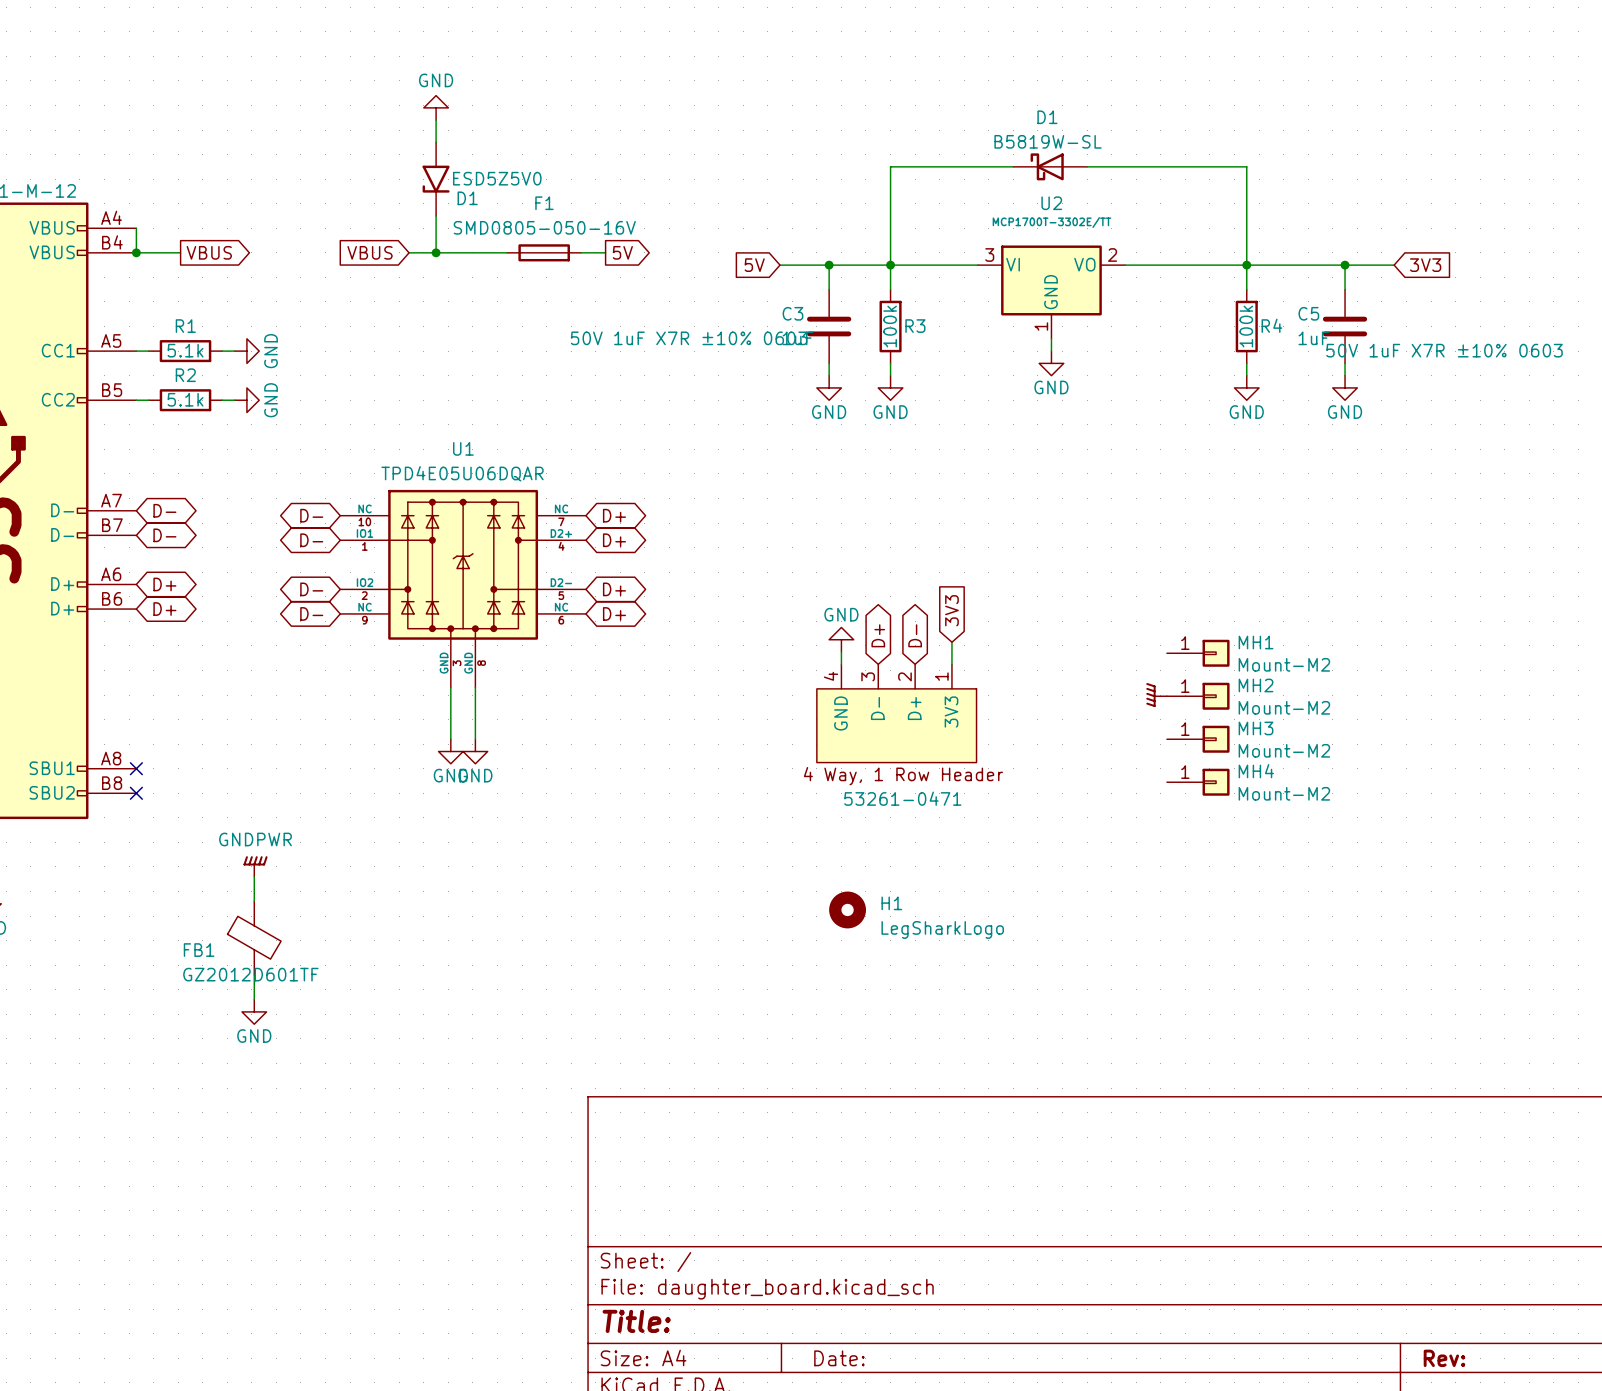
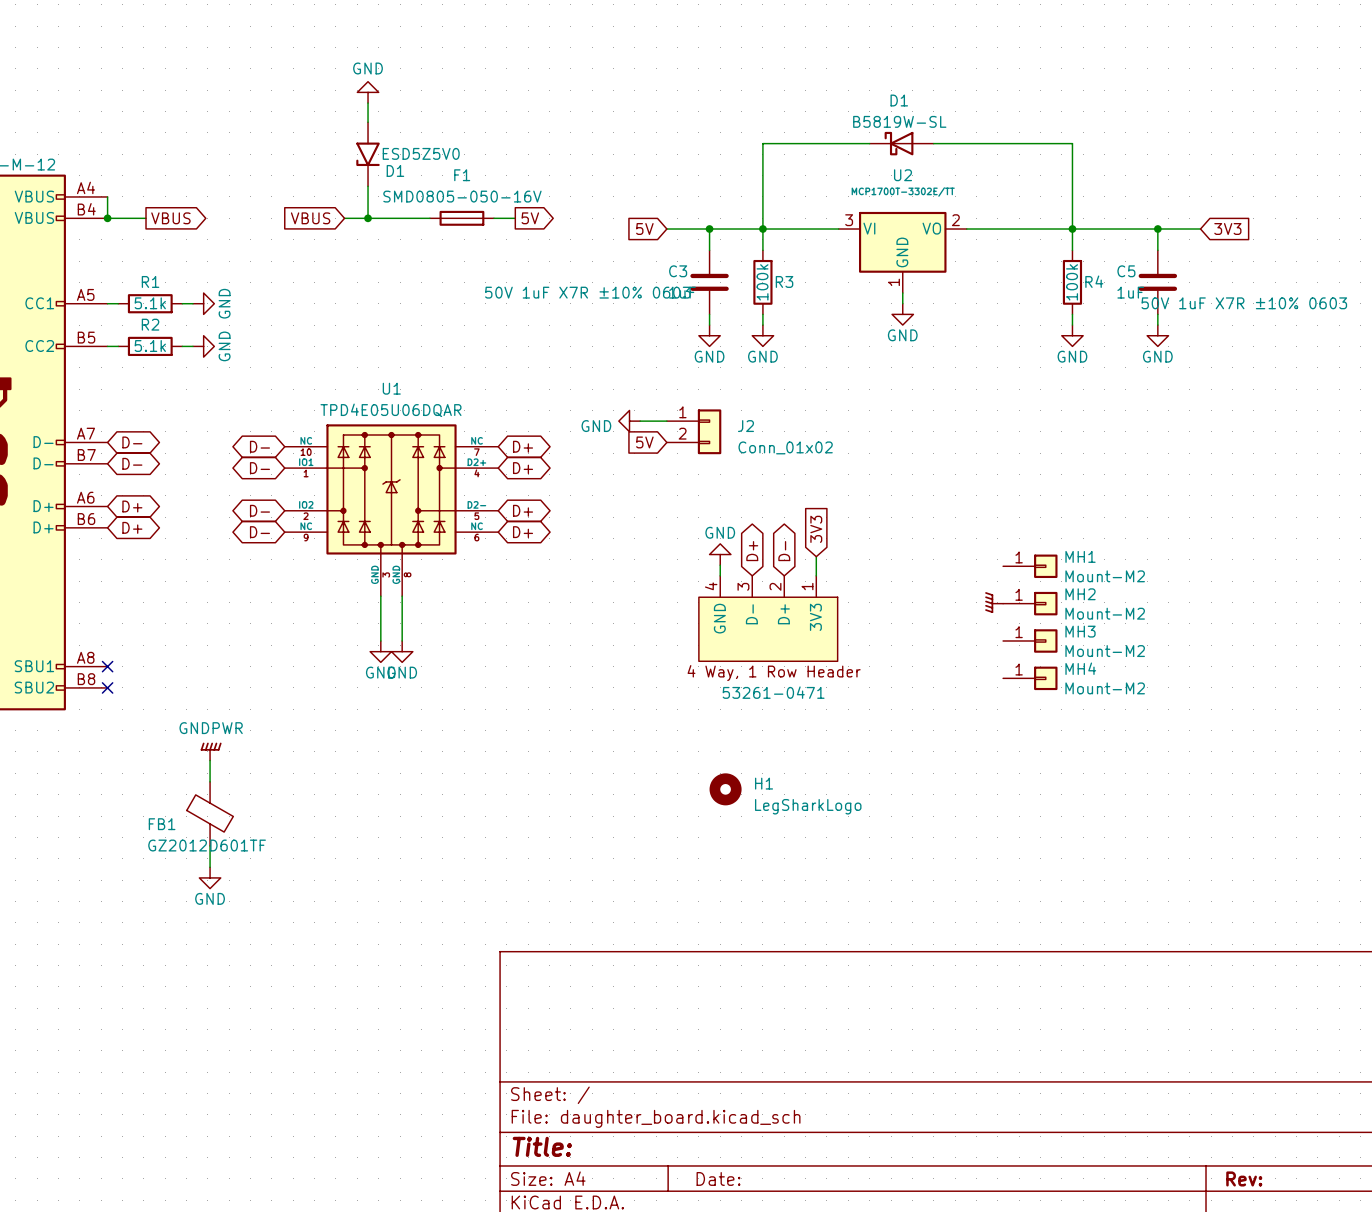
power symbol: none -> GND (629, 421)
wire: none -> (640, 421) (666, 421)
J2: none -> Conn_01x02 (694, 431)
global label: none -> 5V (644, 442)

